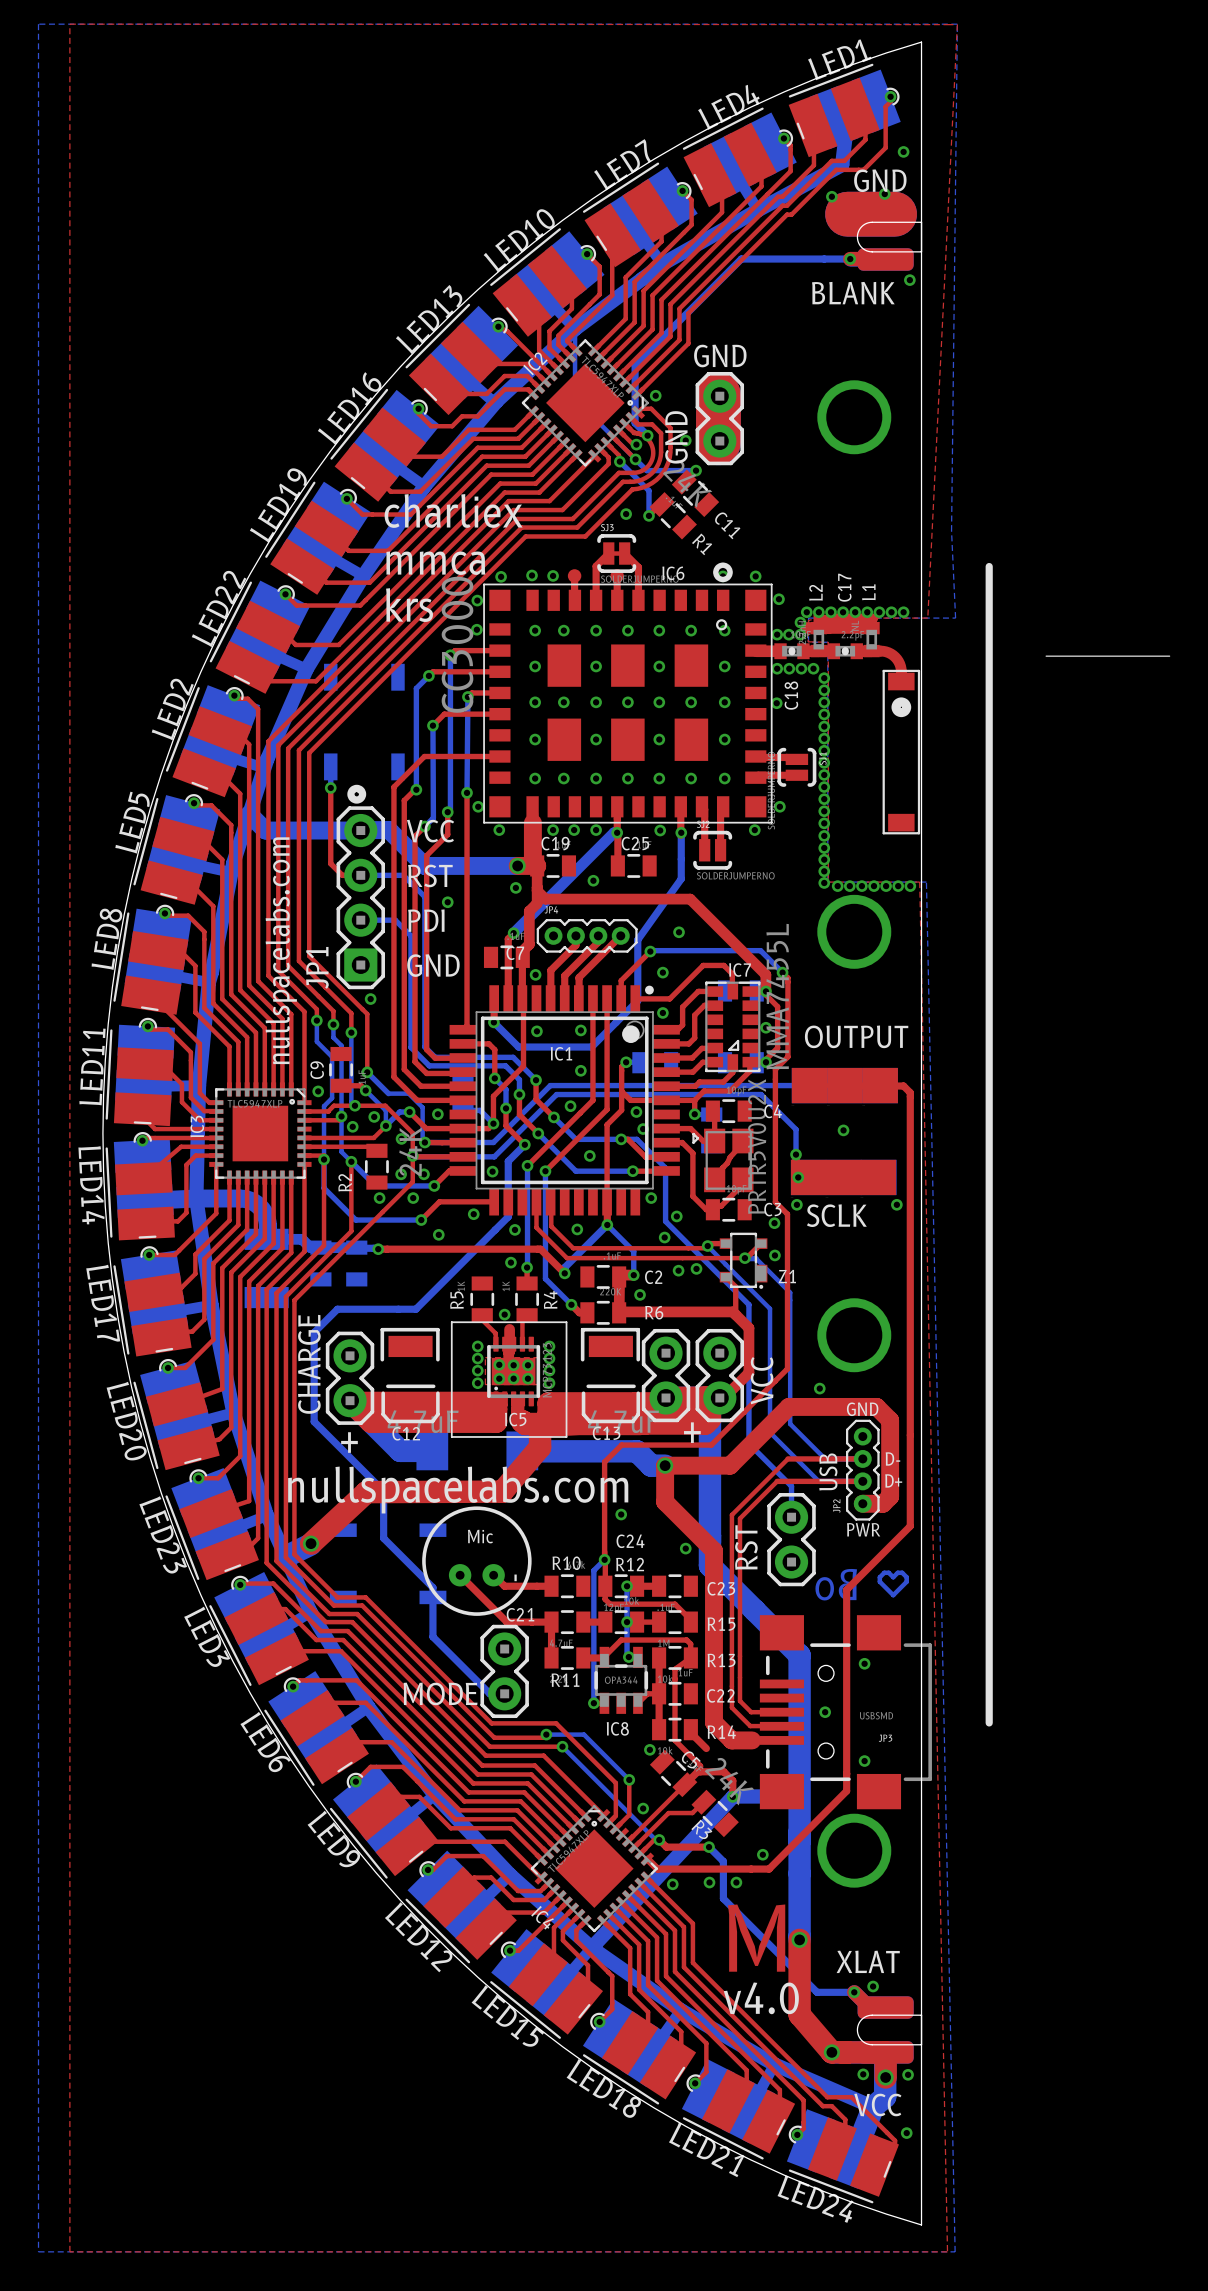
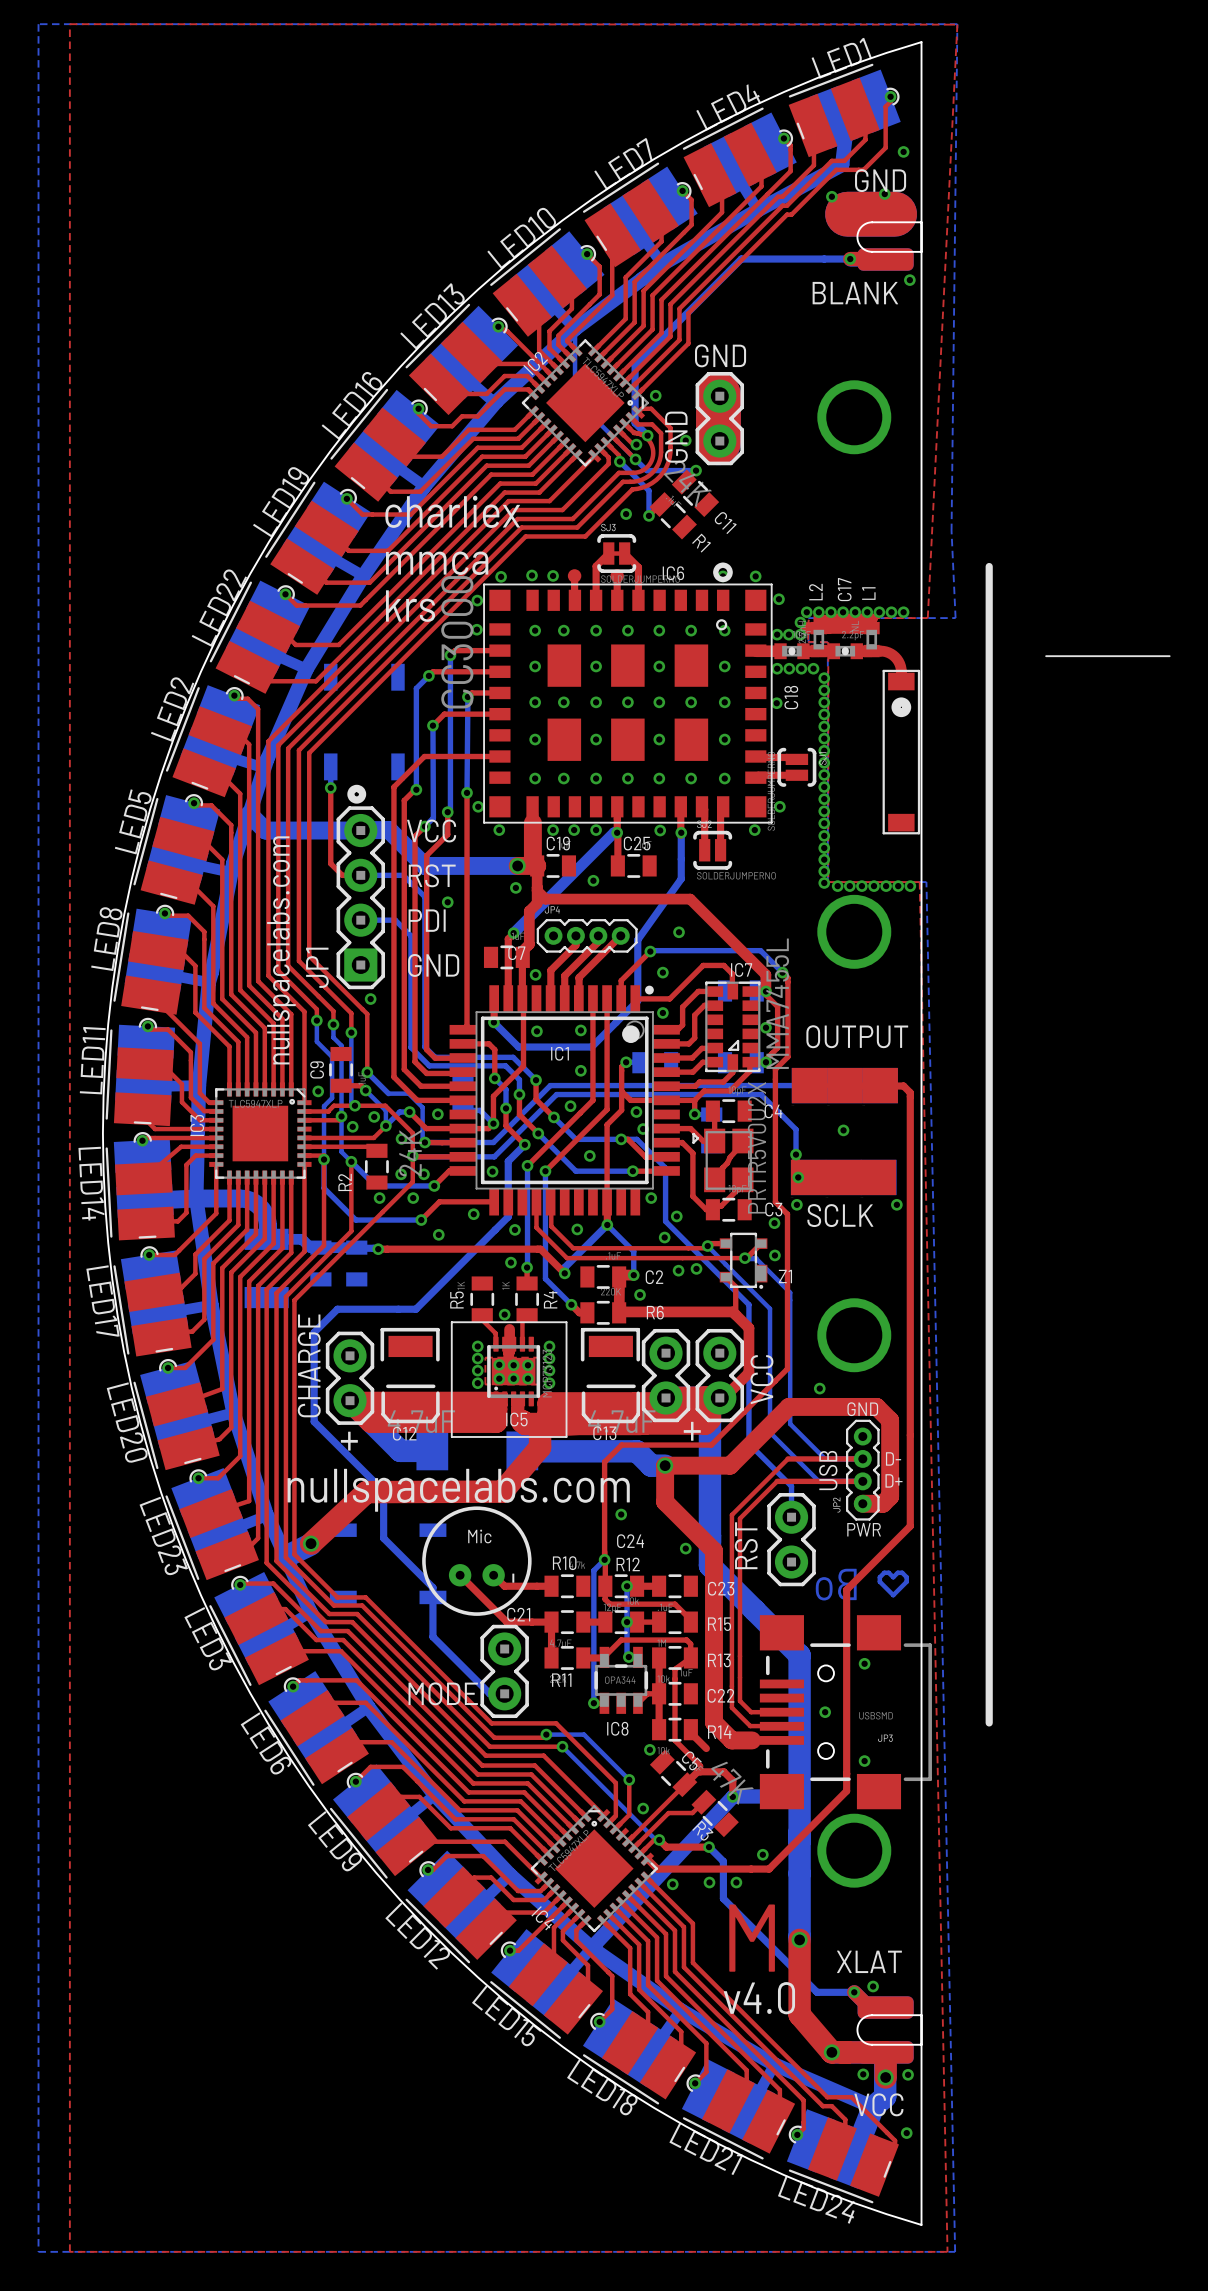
R3 value: 24K (729, 1781) -> 47K (732, 1783)

